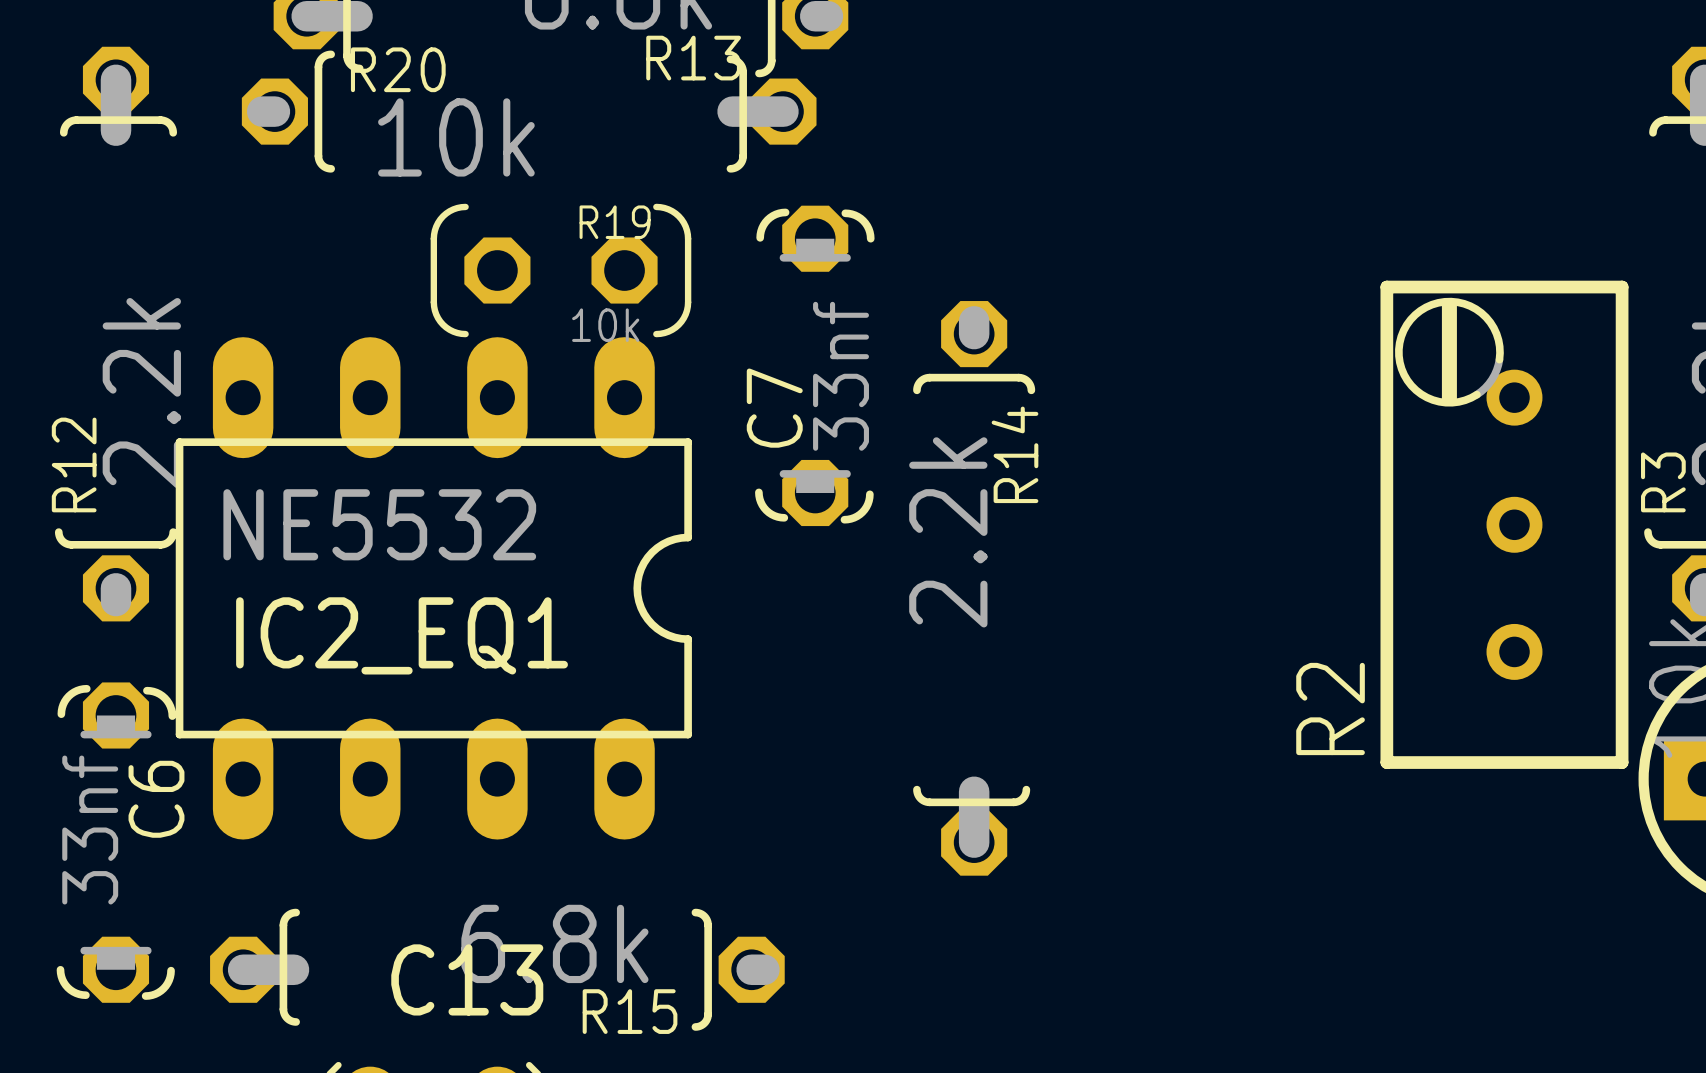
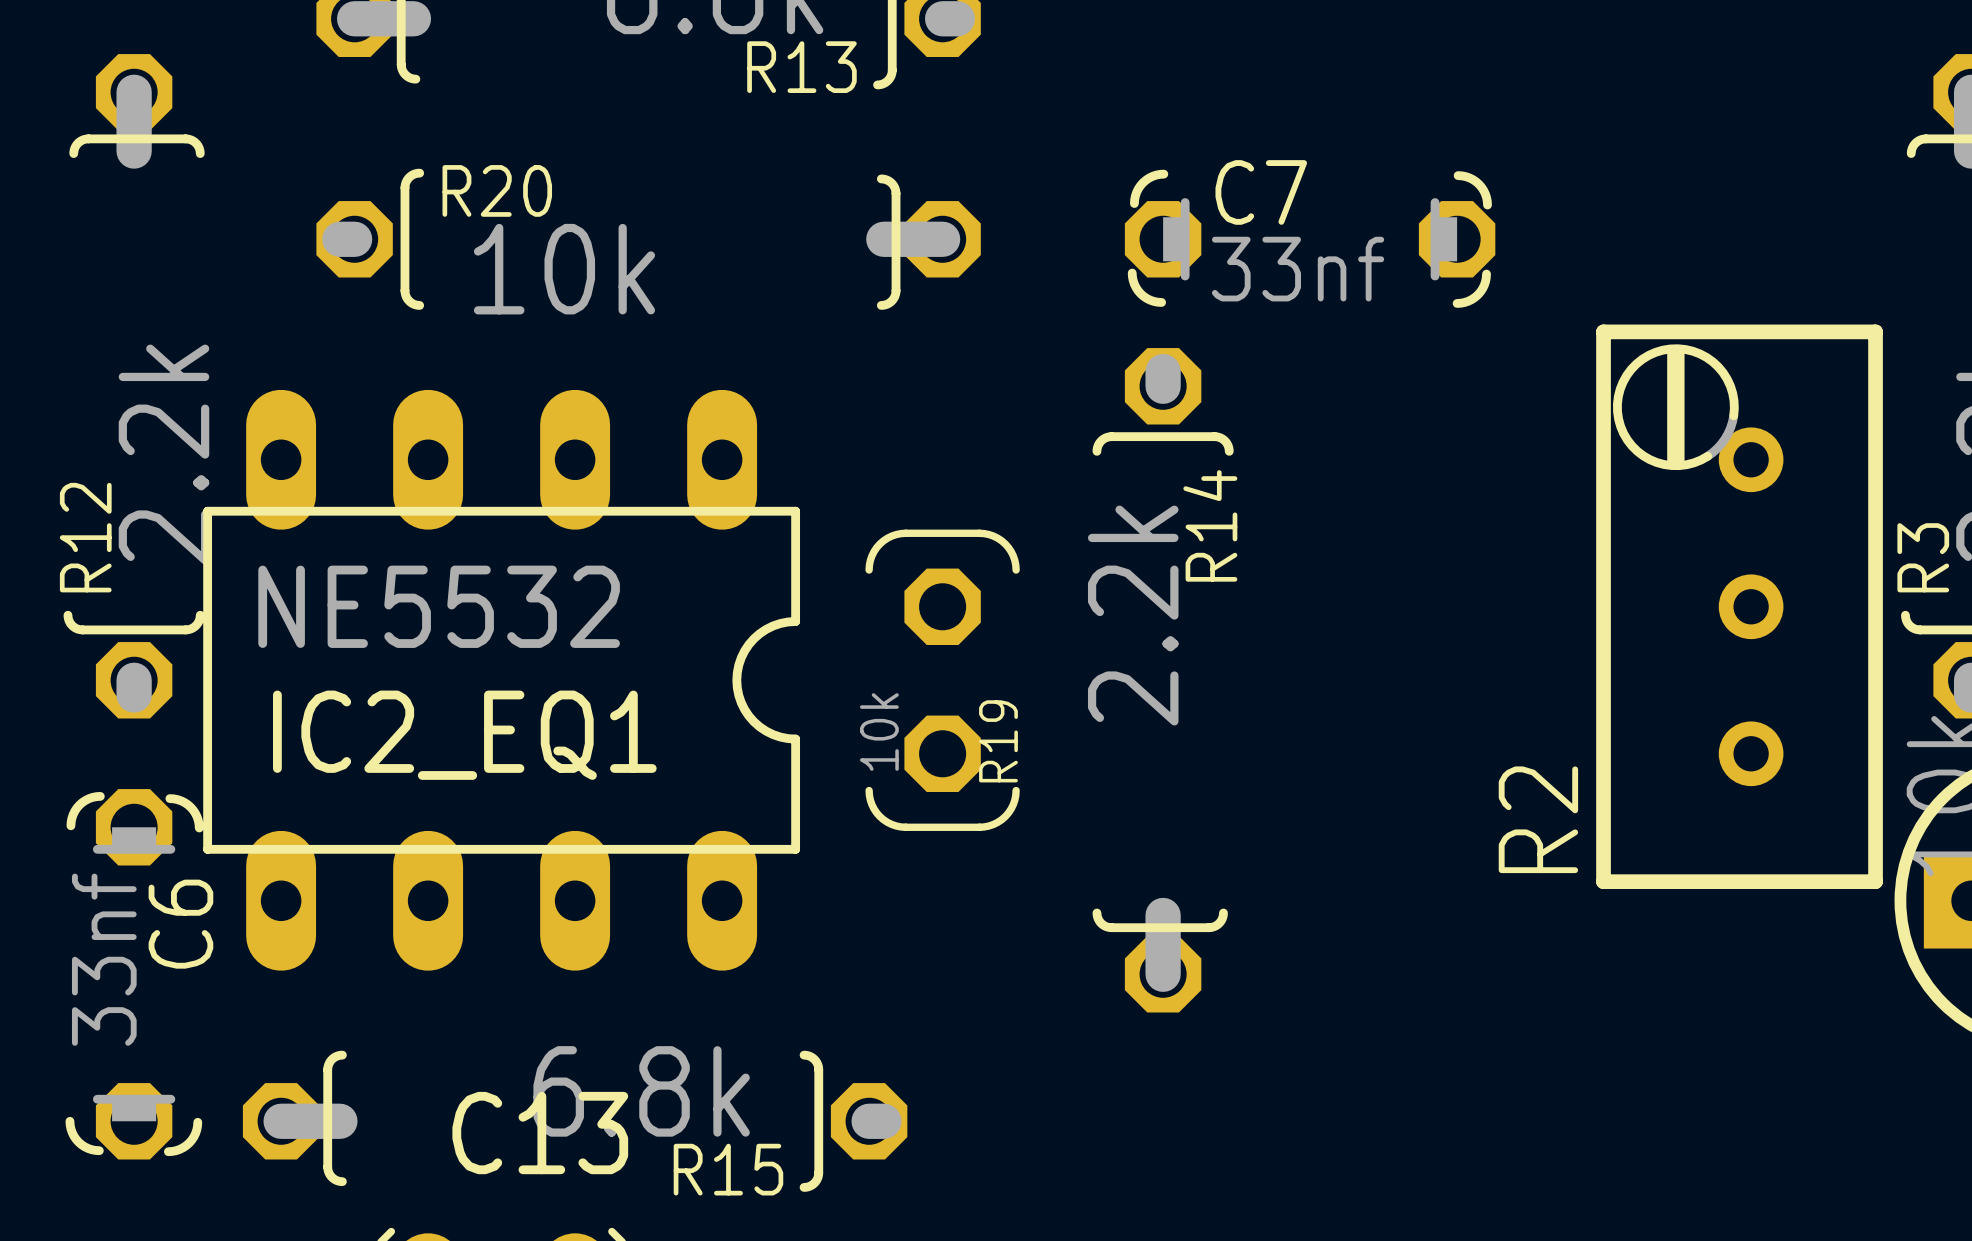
R20 position: (529, 111) -> (648, 239)
R19 rotation: 0° (560, 270) -> 90° clockwise (942, 680)
R19 position: (560, 270) -> (942, 680)
C7 rotation: 0° (814, 365) -> 90° clockwise (1310, 238)
C7 position: (814, 365) -> (1310, 238)
R14 position: (974, 588) -> (1163, 680)

